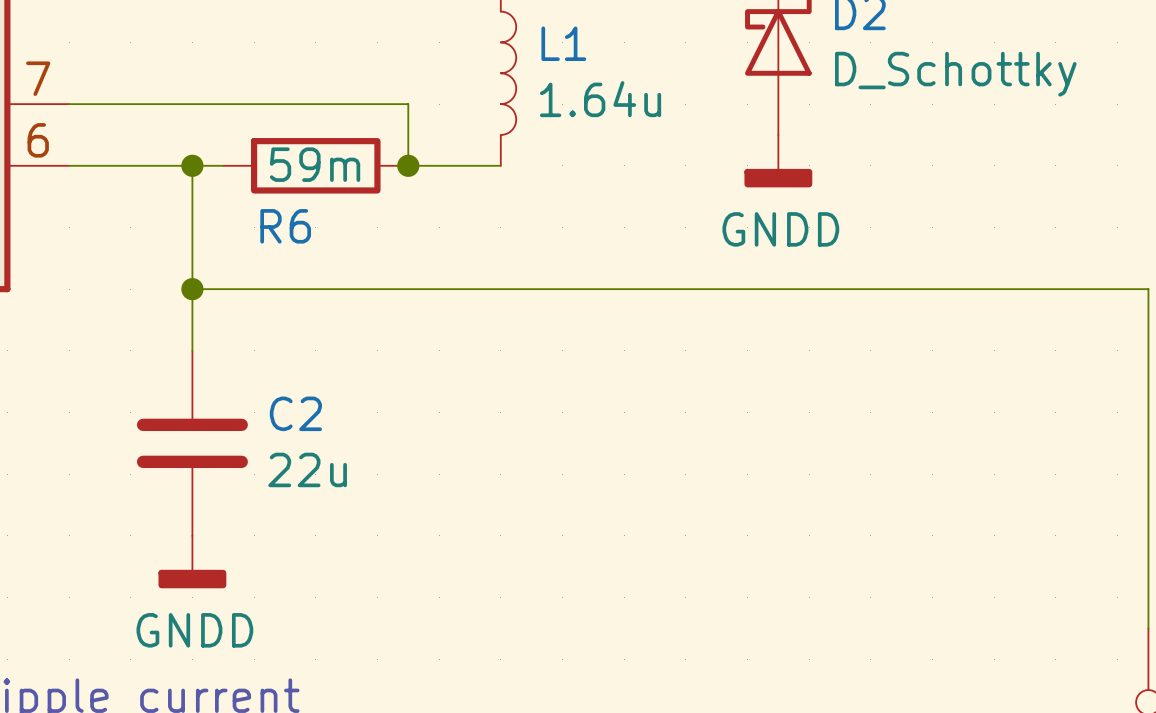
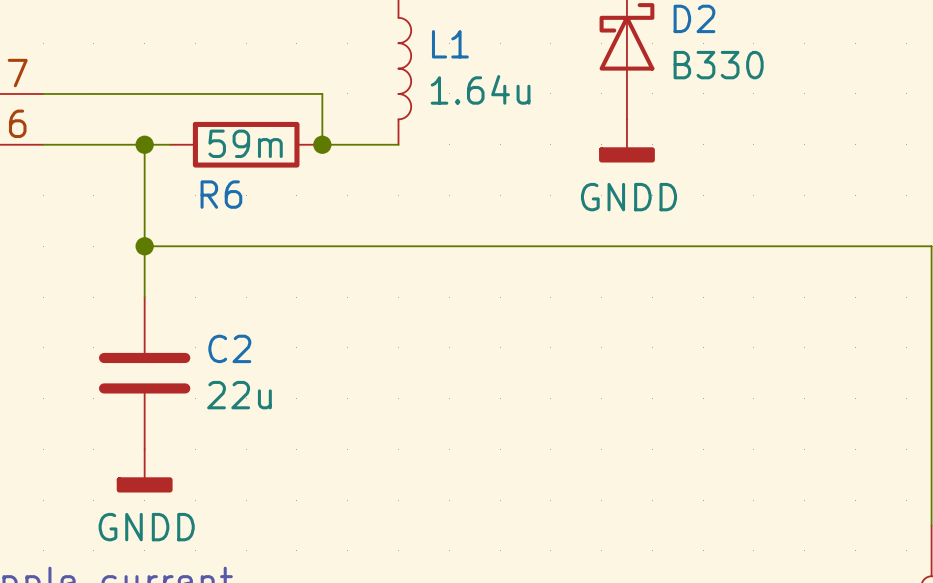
D2 value: D_Schottky (955, 74) -> B330 (718, 65)

